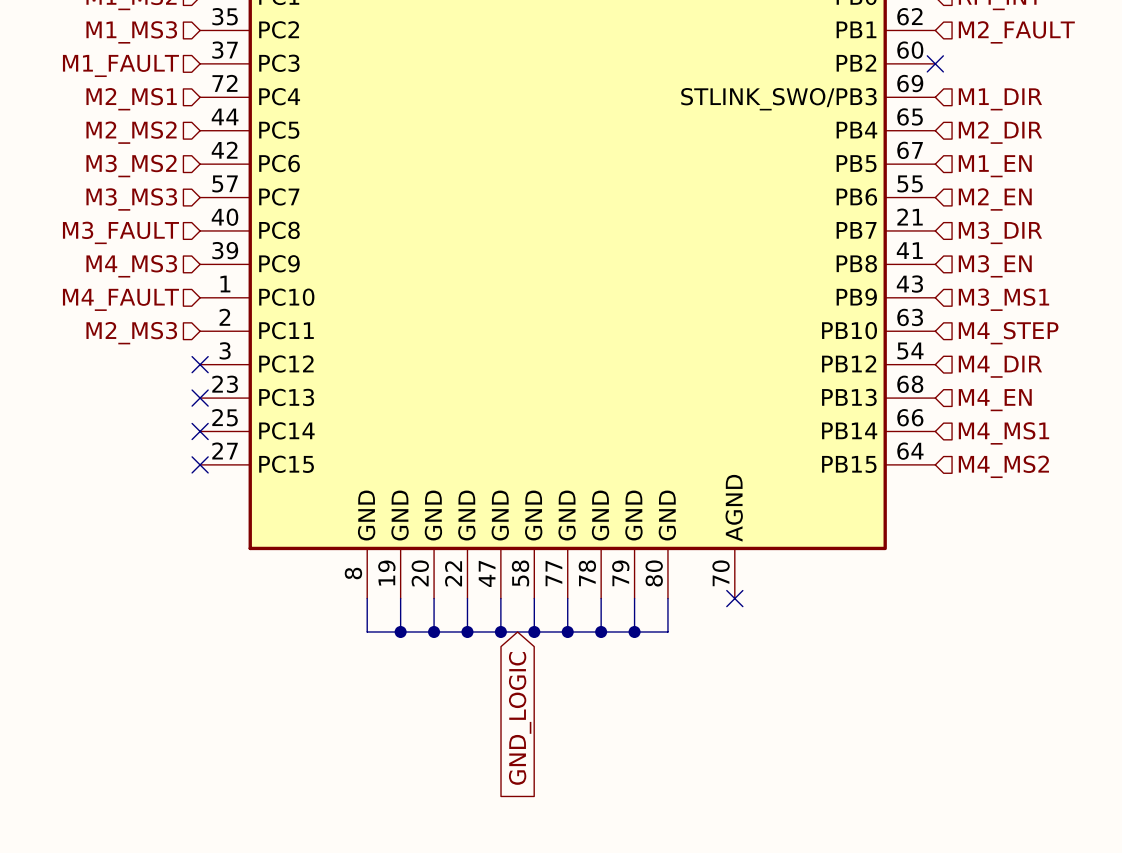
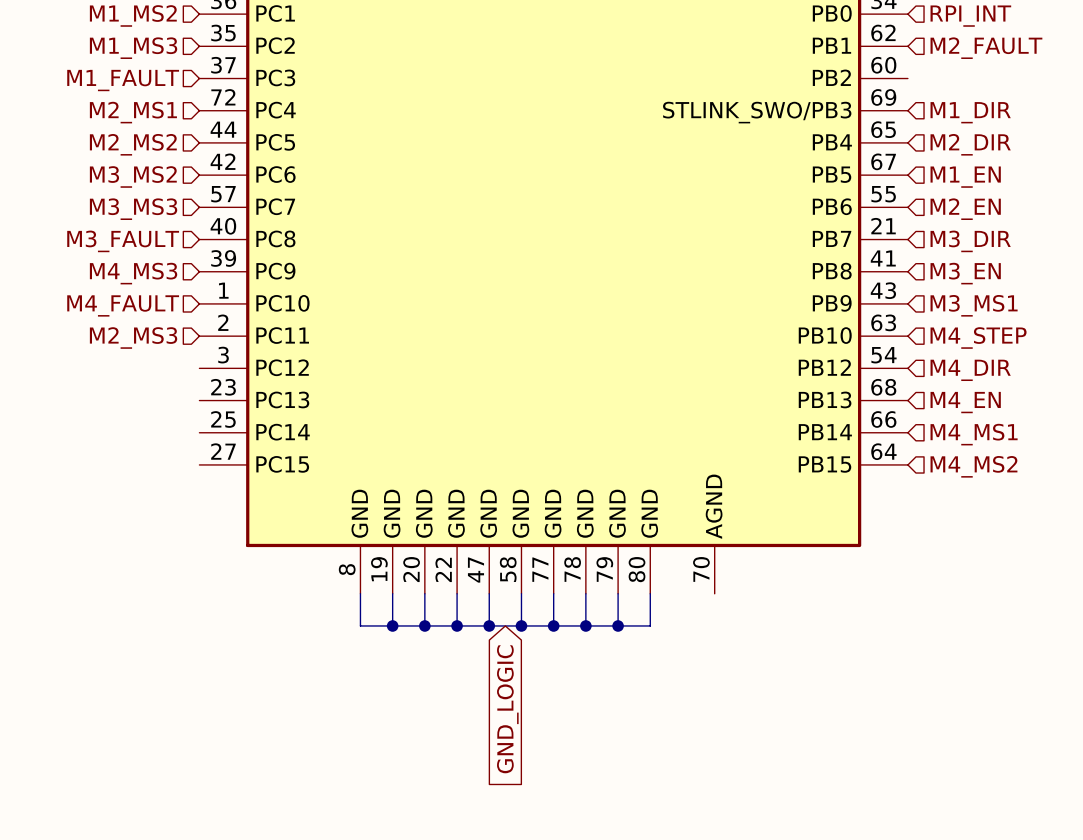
no-connect mark: (935, 63) -> none
no-connect mark: (200, 364) -> none
no-connect mark: (200, 398) -> none
no-connect mark: (200, 431) -> none
no-connect mark: (200, 464) -> none
no-connect mark: (734, 598) -> none

